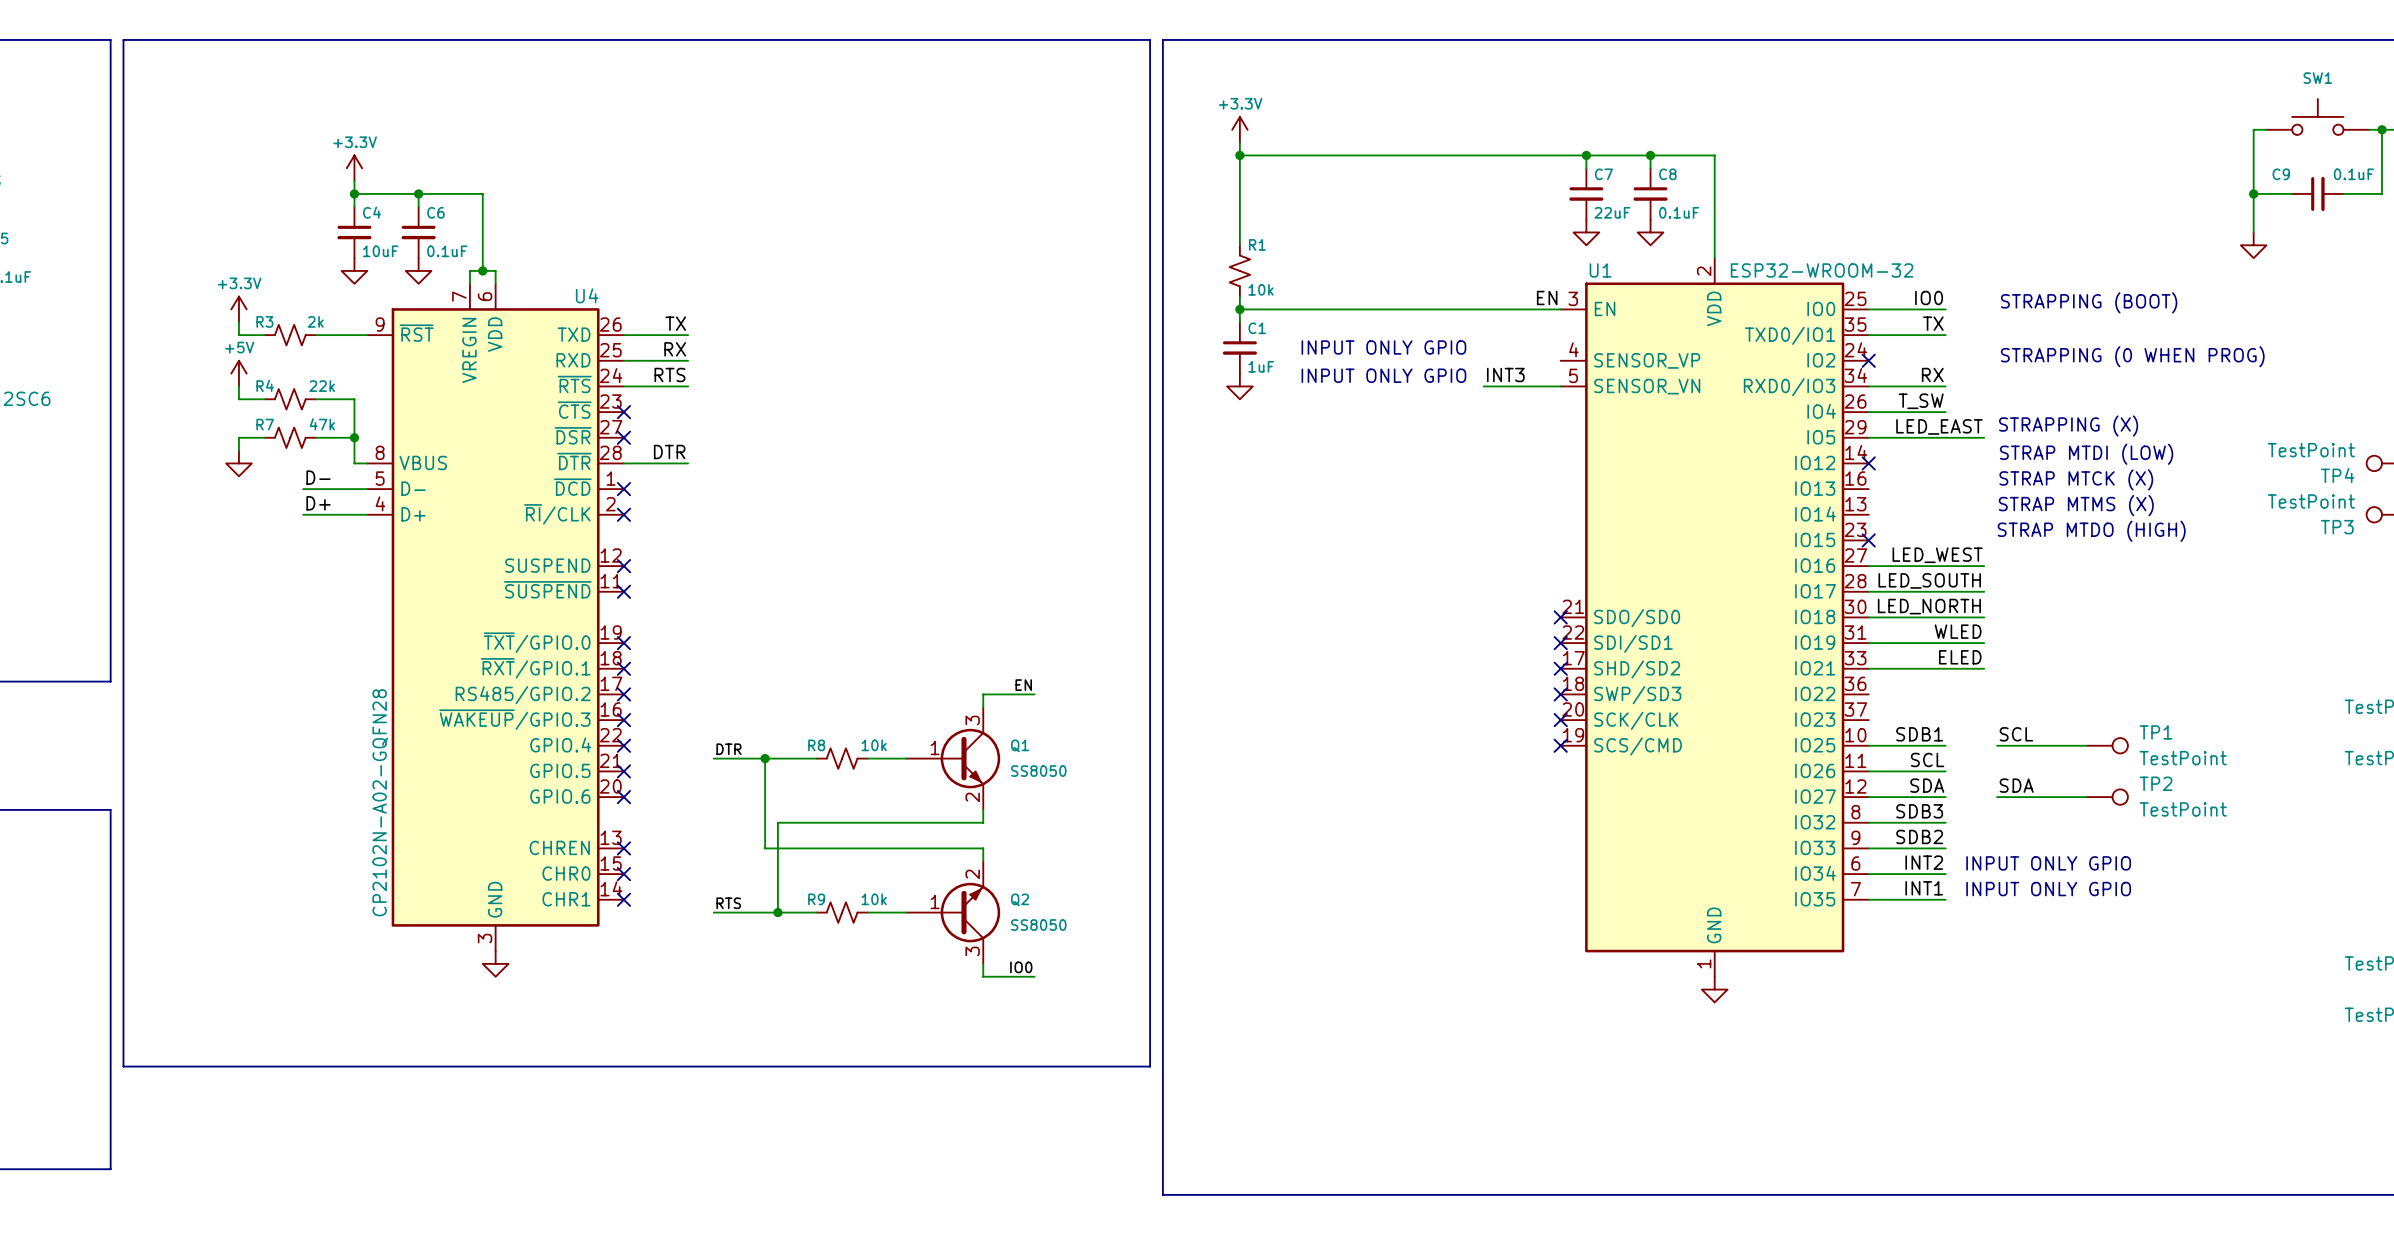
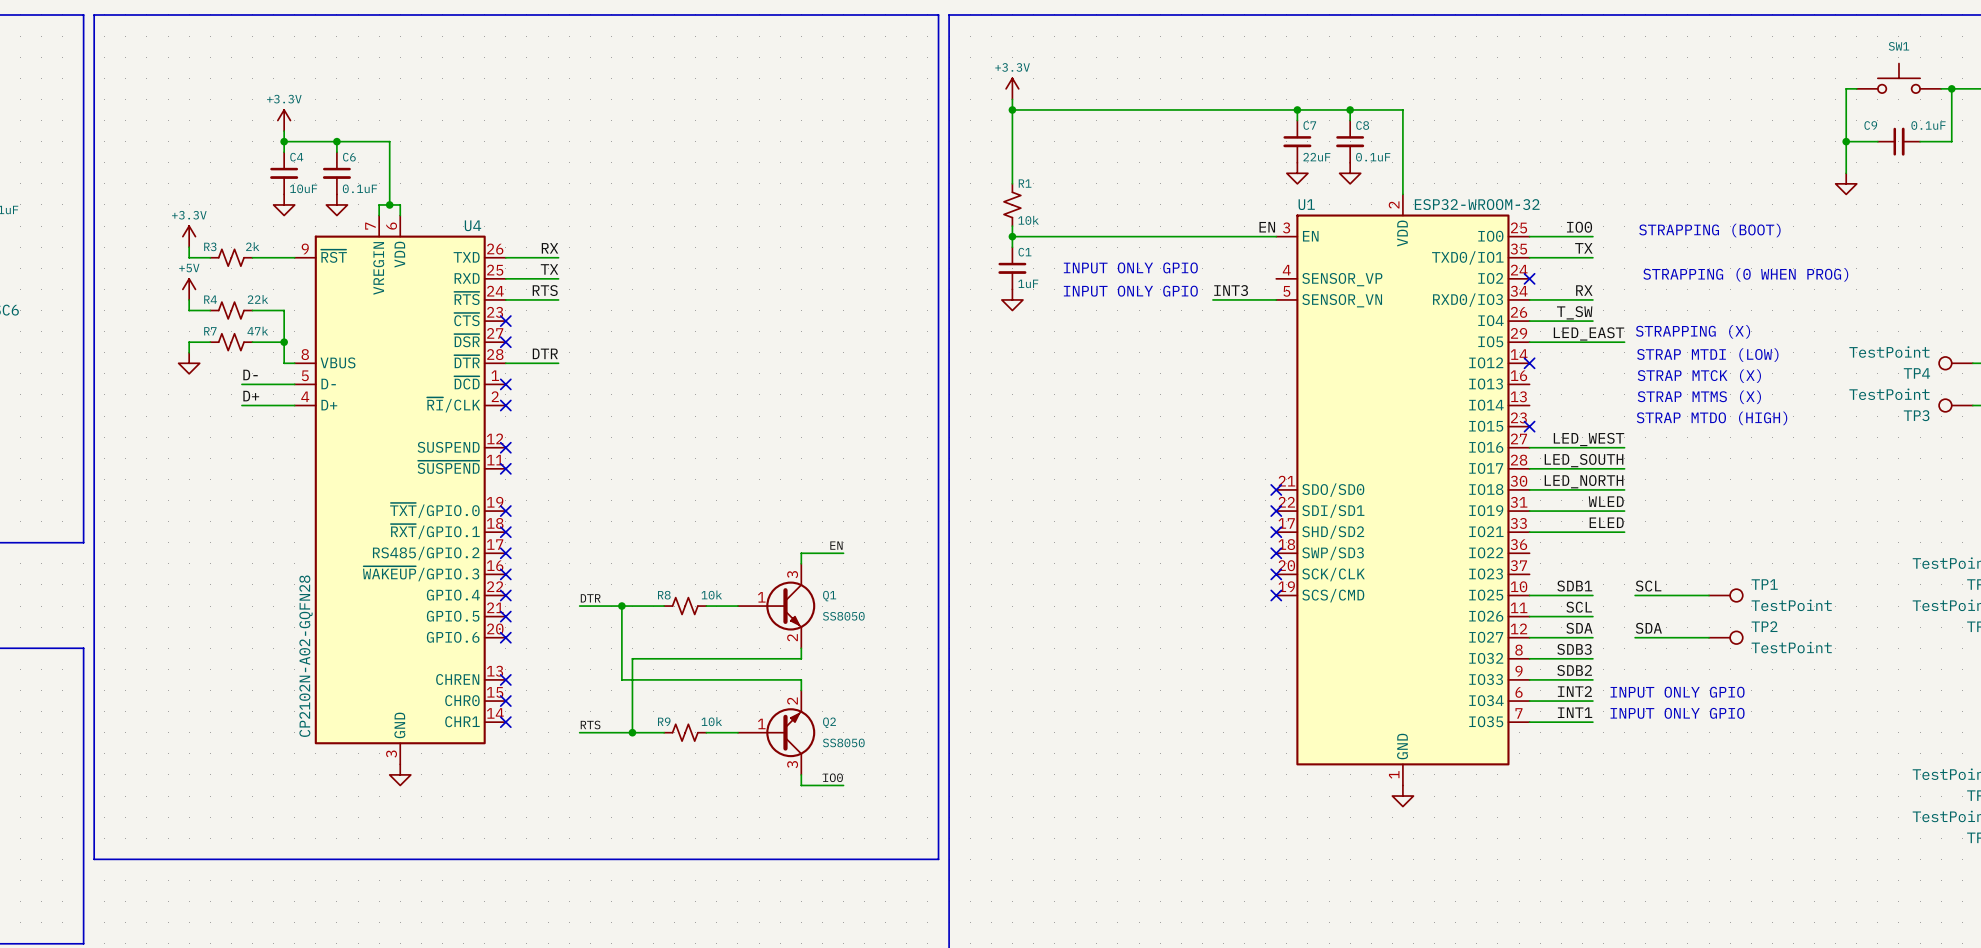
label: TX (675, 323) -> RX (549, 248)
label: RX (675, 349) -> TX (549, 269)

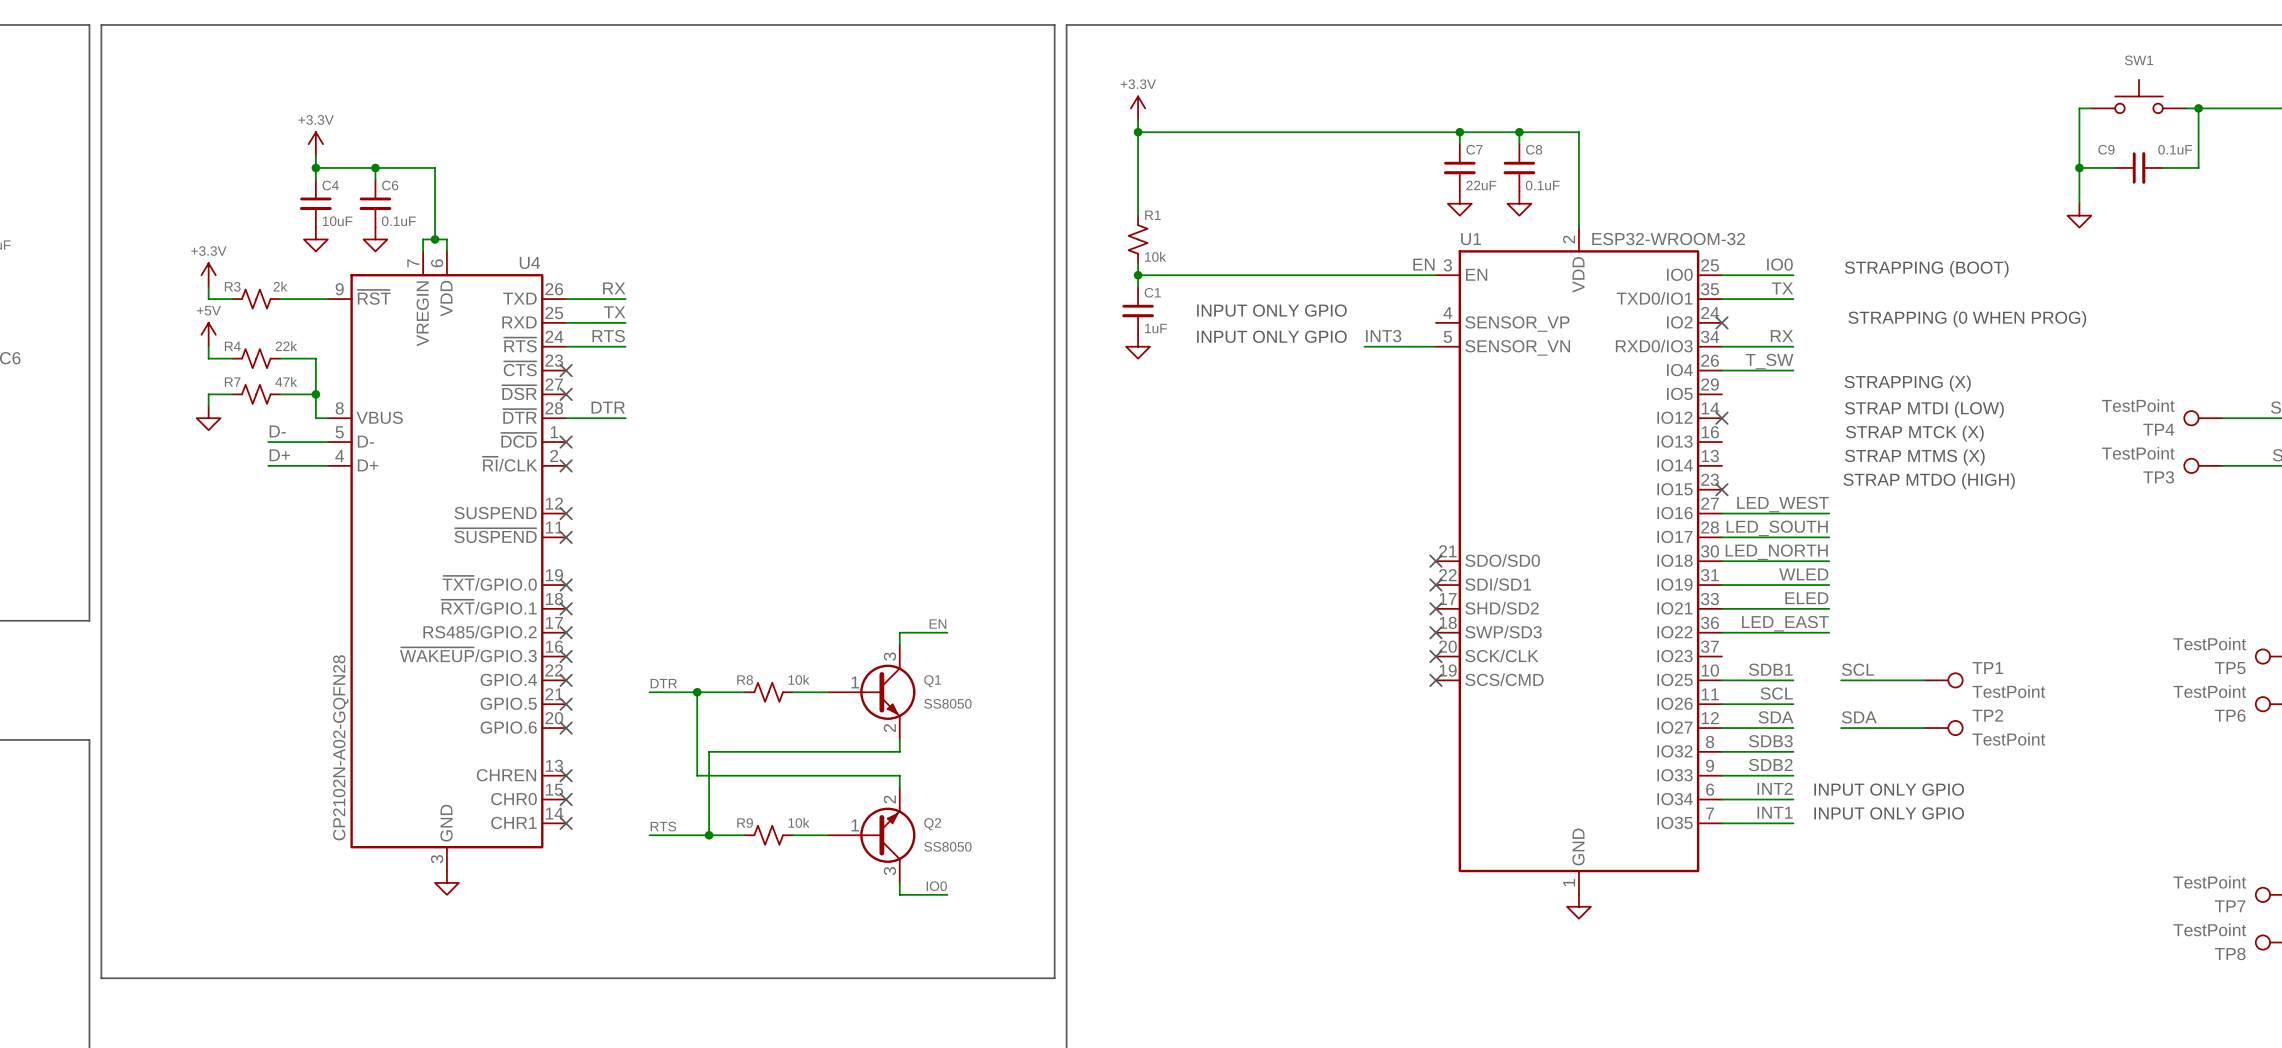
label: LED_EAST (1588, 333) -> none
wire: (1529, 342) (1624, 342) -> none
label: none -> LED_EAST (1785, 623)
wire: none -> (1721, 632) (1829, 632)

